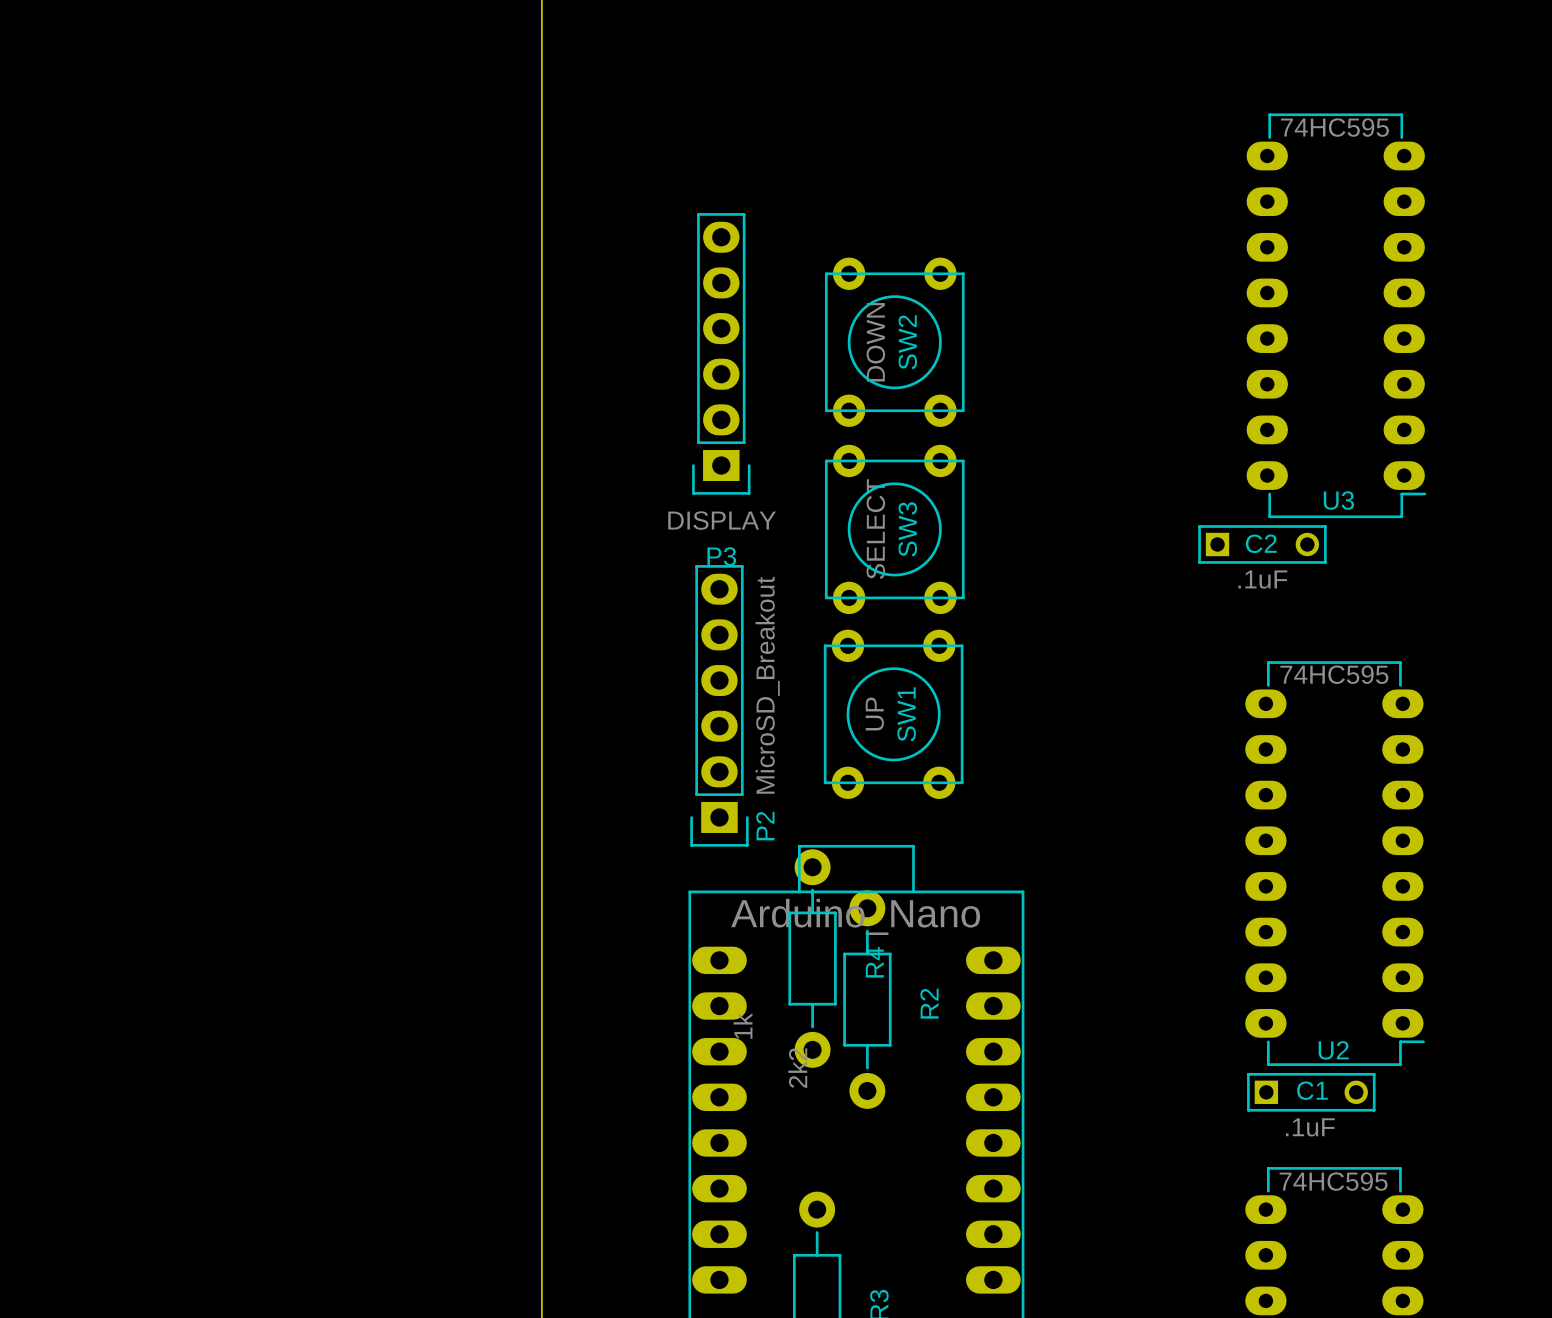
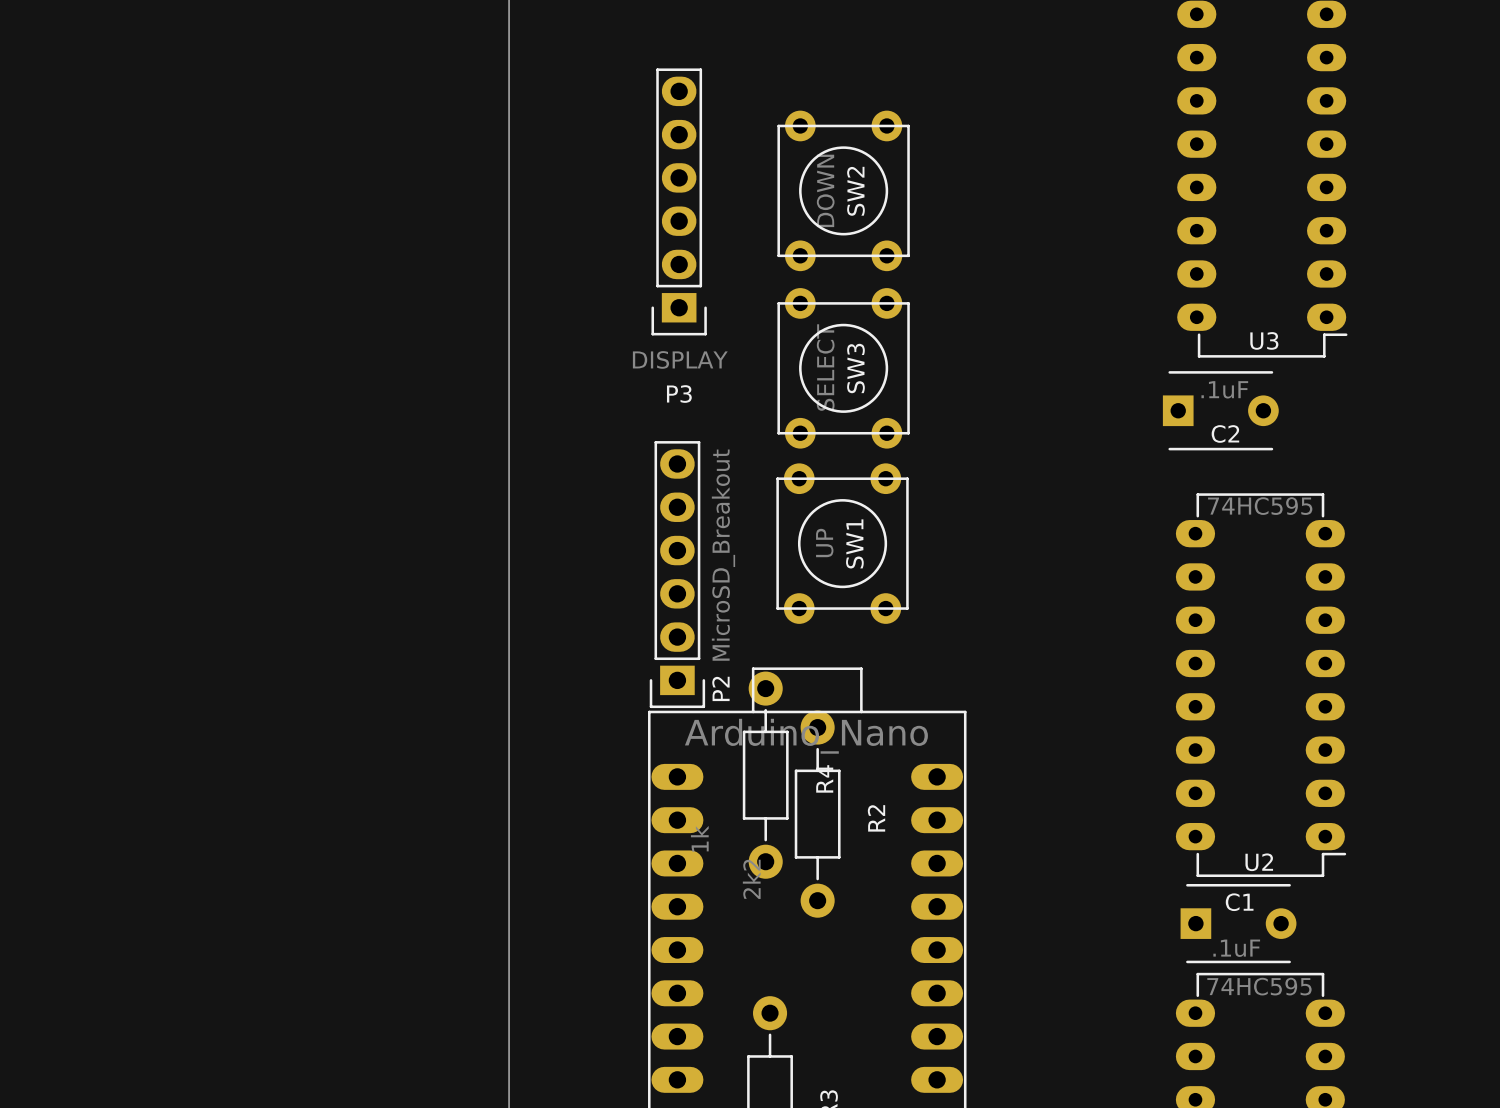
C2 footprint: [1198, 525, 1327, 564] -> [1162, 371, 1279, 451]
C2 value position: .1uF (1262, 579) -> .1uF (1224, 389)
P2 position: (719, 705) -> (677, 574)
C1 footprint: [1247, 1072, 1376, 1112] -> [1180, 883, 1297, 964]

